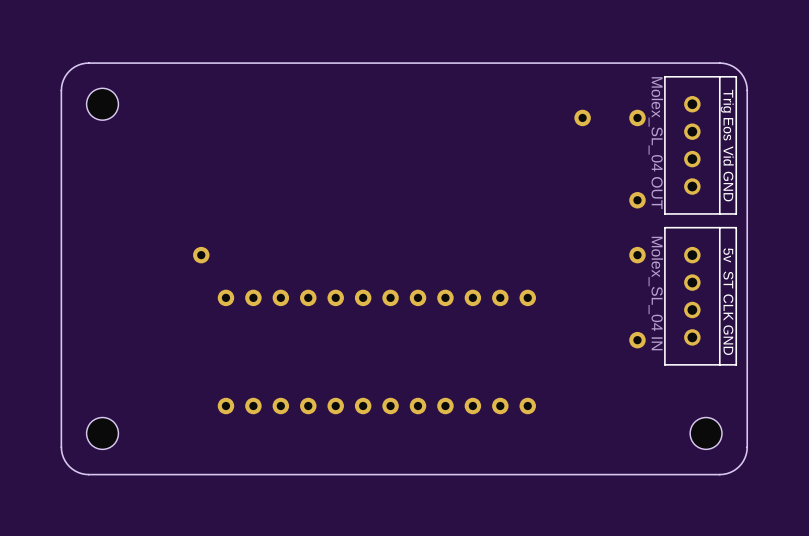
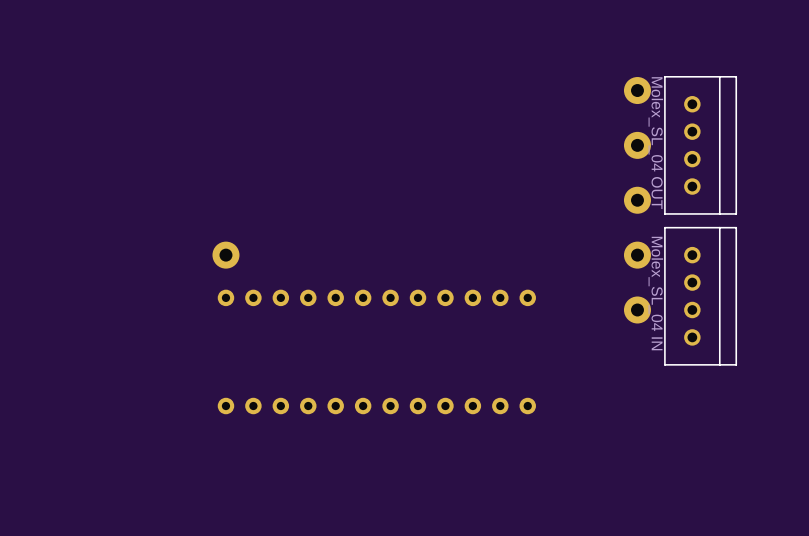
board edge: (719, 63) (88, 63) (75, 66) (65, 76) (61, 90) (61, 447) (65, 460) (75, 470) (88, 474) (719, 474) (733, 470) (743, 460) (747, 447) (747, 90) (745, 80) (739, 71) (730, 65) (719, 63) -> none
part: none -> (637, 90)
text: Trig (727, 101) -> none
part: (102, 104) -> none
part: (582, 117) -> none
part: (637, 117) -> none
text: Eos (728, 129) -> none
part: none -> (637, 145)
text: Vid (728, 155) -> none
text: GND (728, 186) -> none
part footprint: [629, 192, 646, 209] -> [623, 186, 651, 214]
part footprint: [629, 246, 646, 264] -> [623, 241, 651, 269]
part: (201, 255) -> none
part: none -> (225, 255)
text: 5v (728, 255) -> none
text: ST (728, 279) -> none
text: CLK (728, 307) -> none
part: none -> (637, 309)
part: (637, 340) -> none
text: GND (728, 340) -> none
part: (102, 433) -> none
part: (706, 433) -> none

